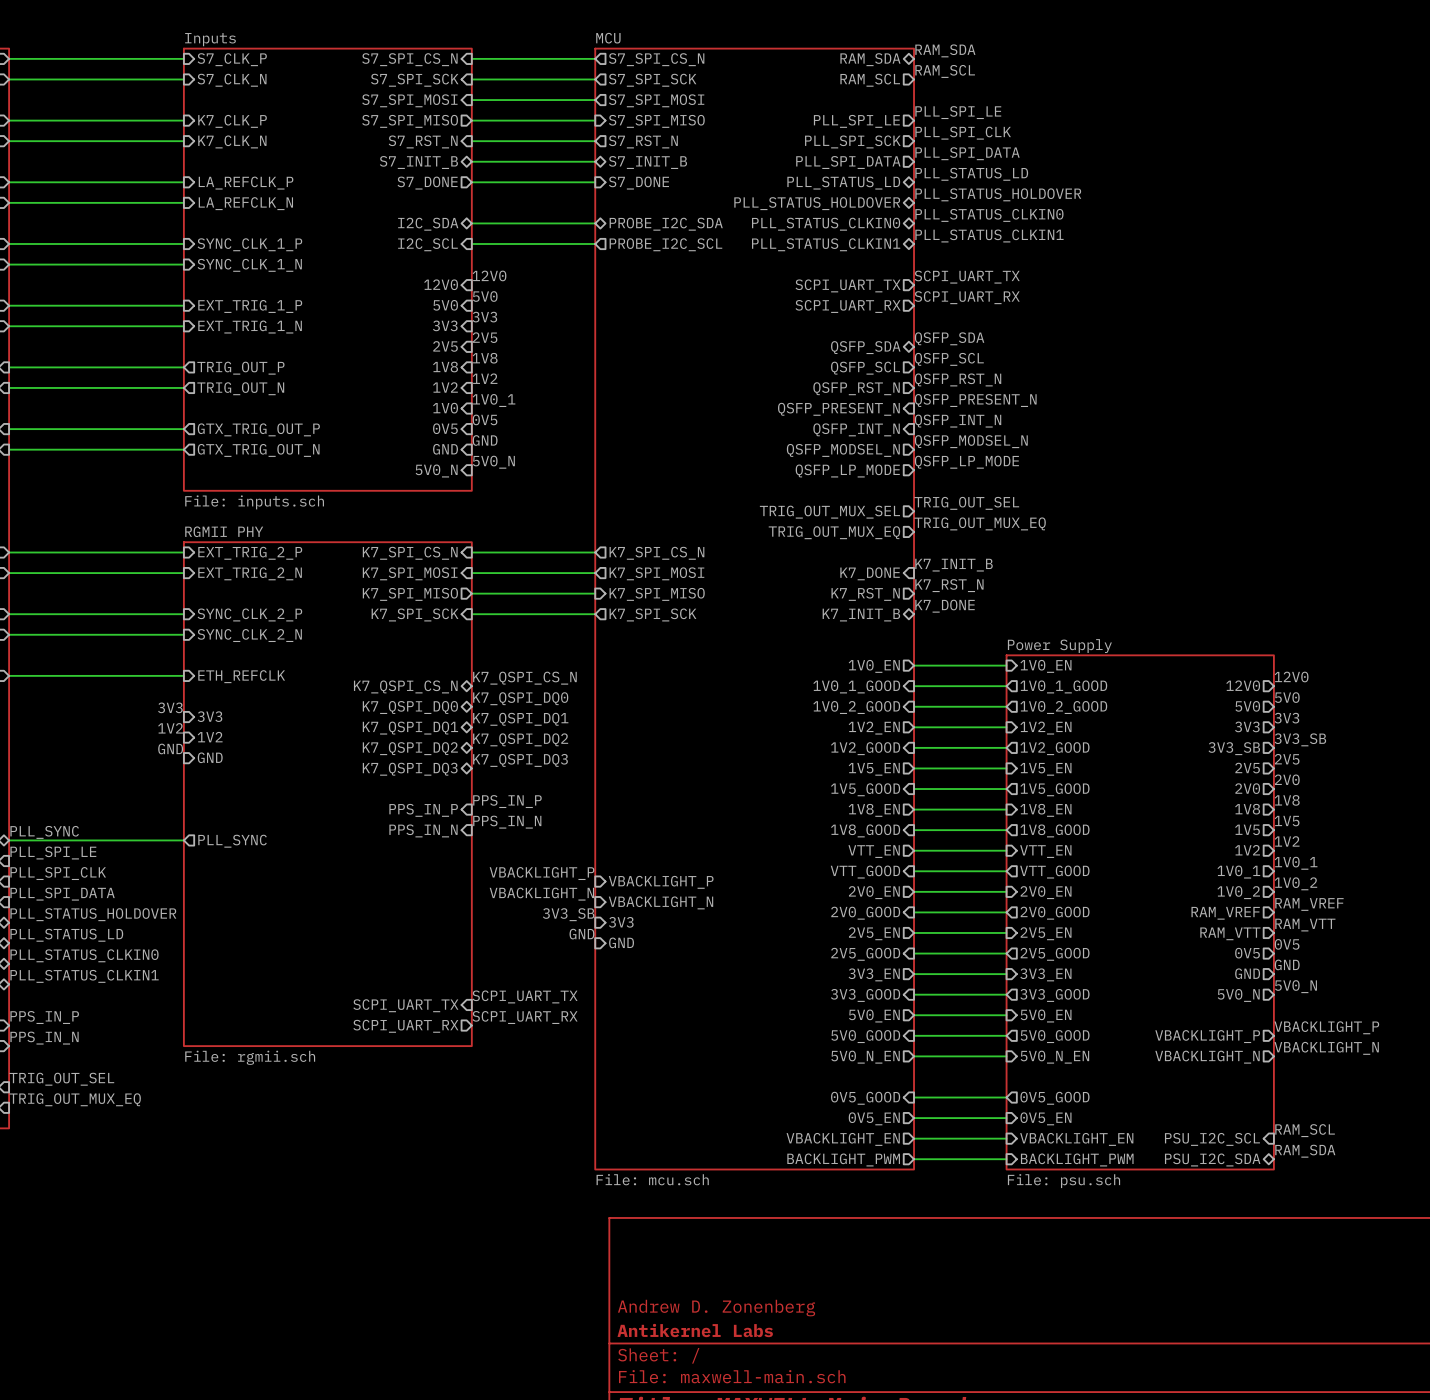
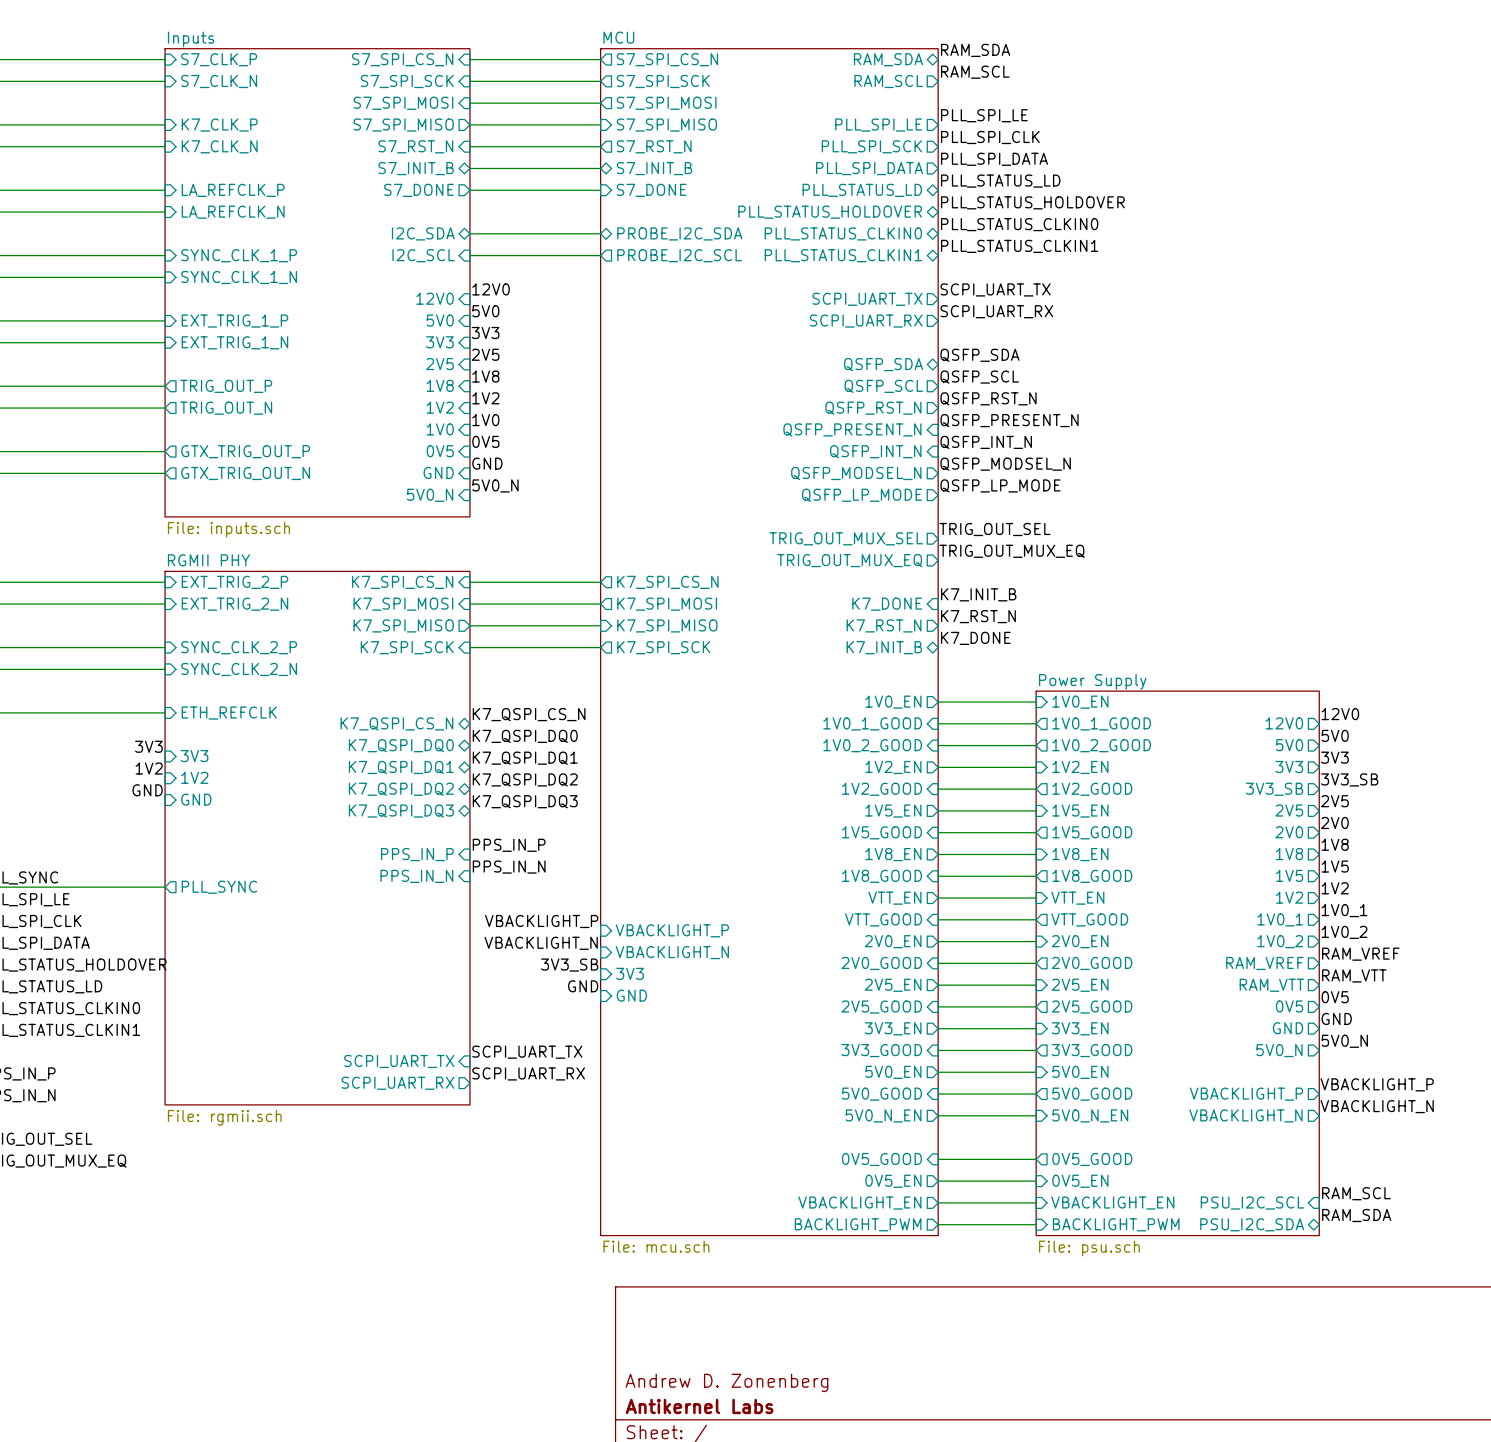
label: 1V0_1 (493, 400) -> 1V0 (485, 420)

